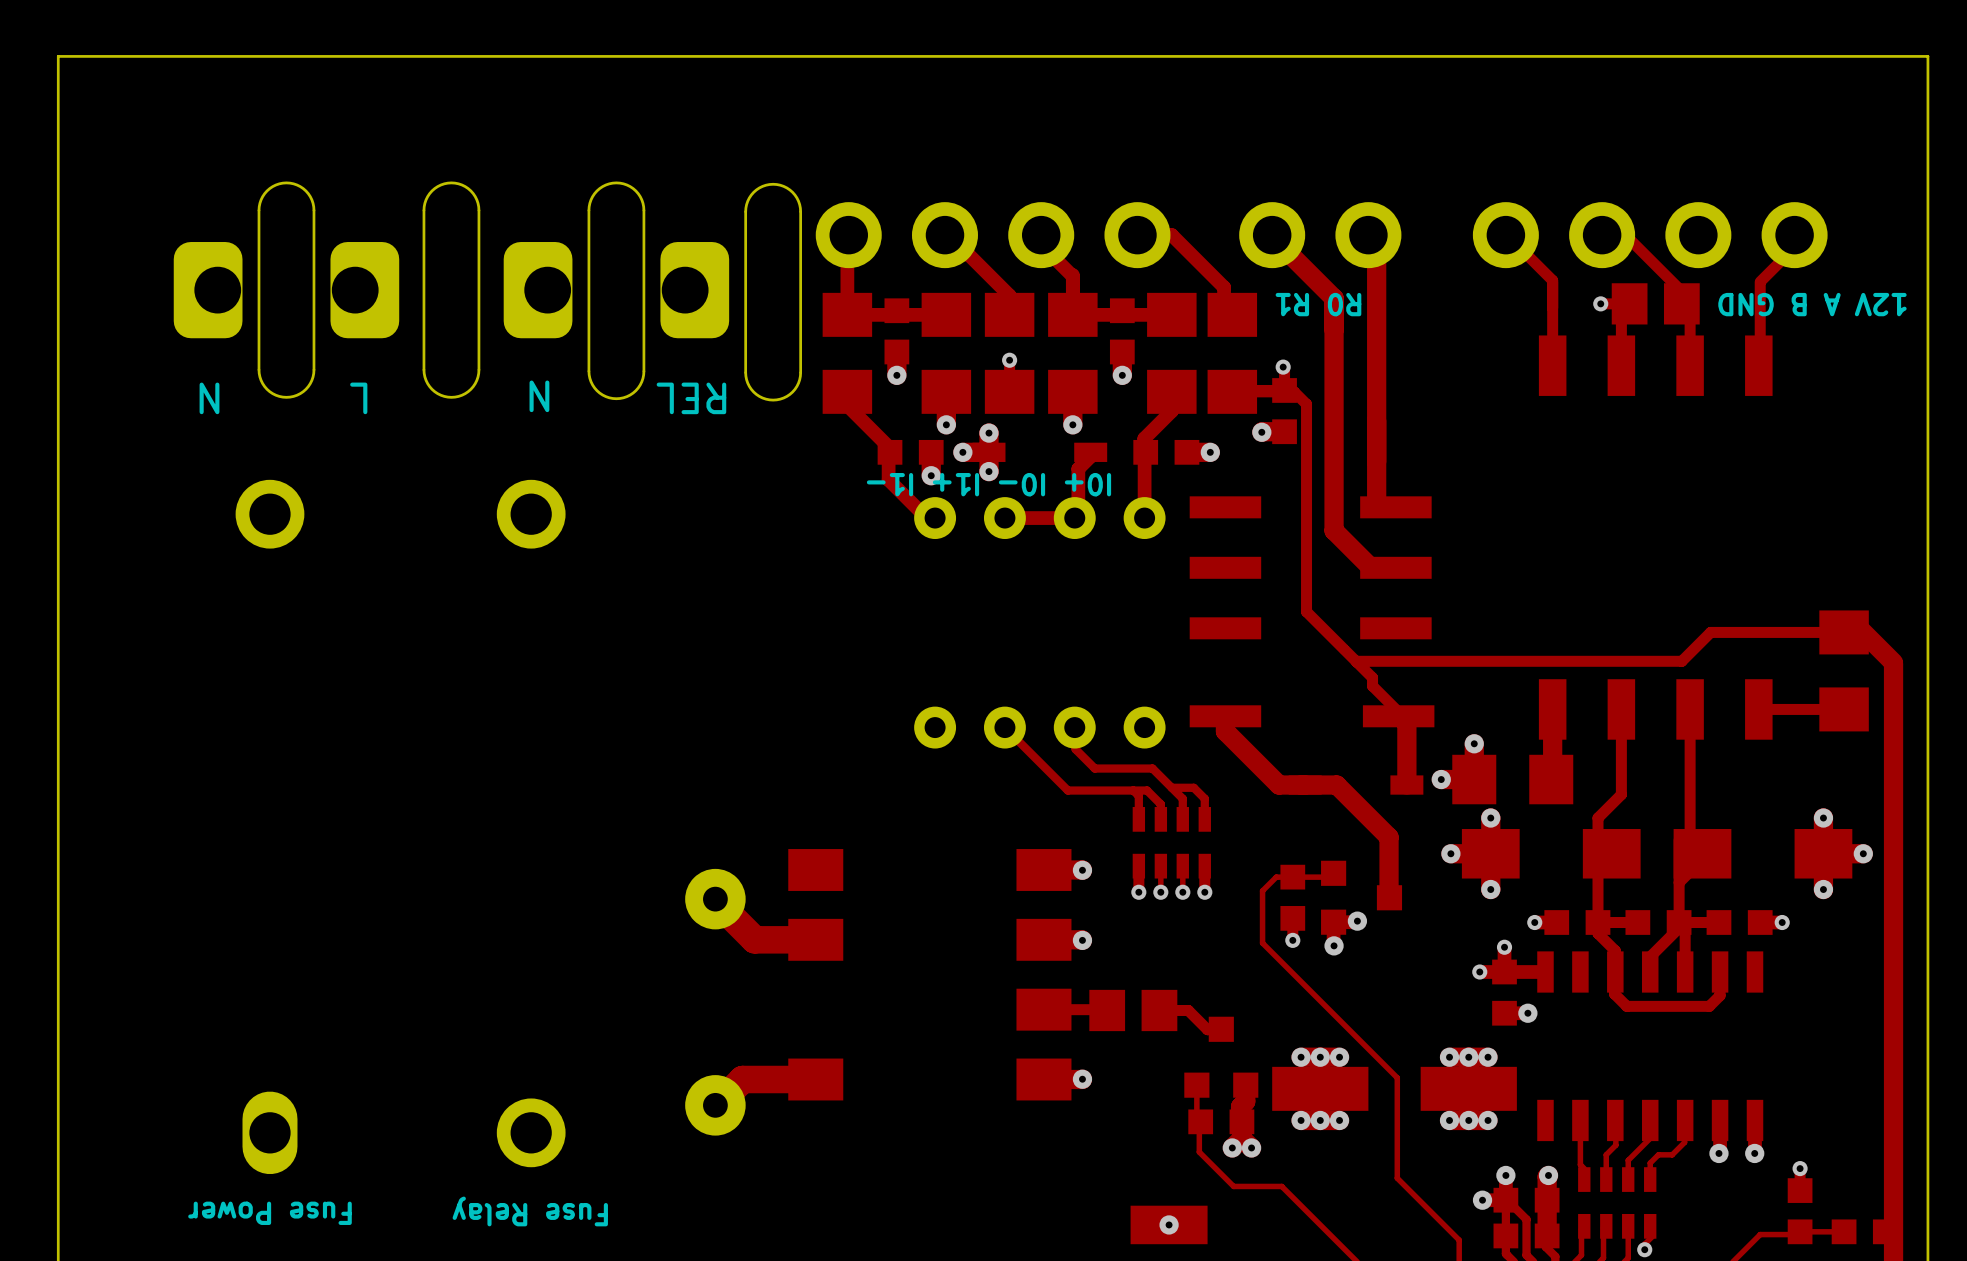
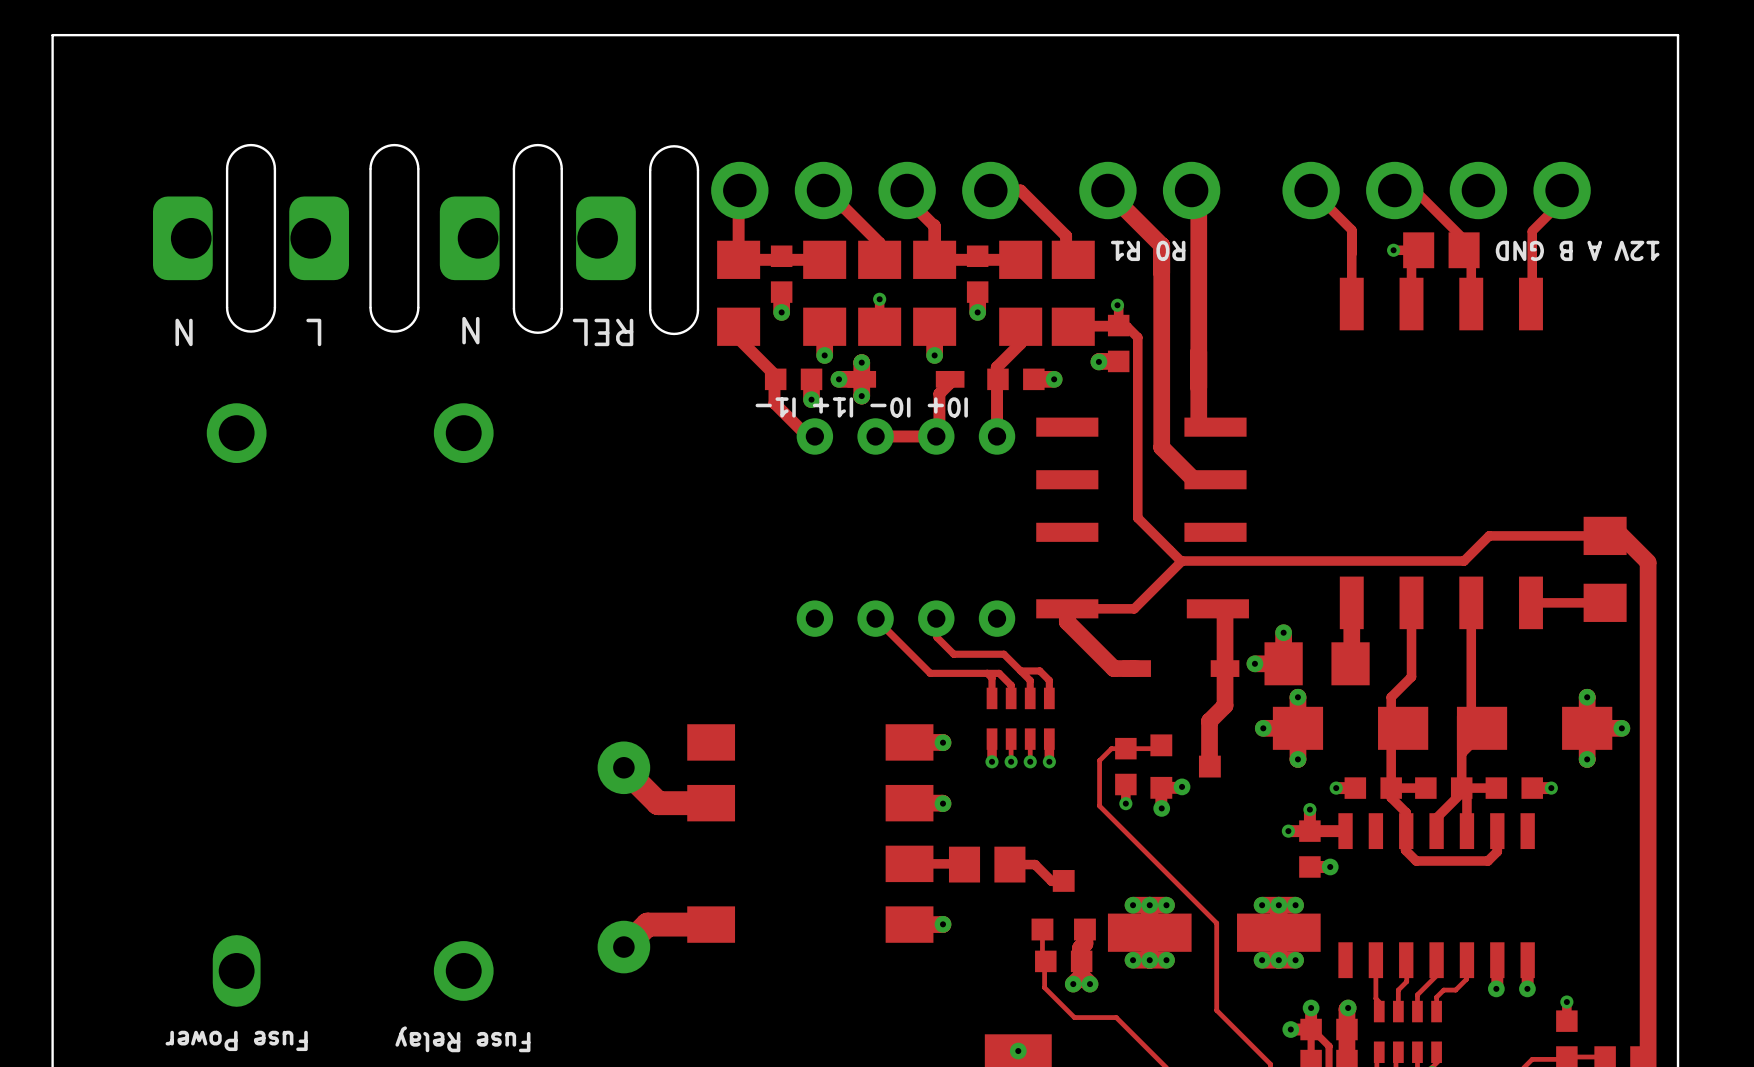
track: (1357, 661) (1372, 677) (1372, 686) (1402, 716) -> (1182, 561) (1134, 608) (1067, 608)
track: (1305, 785) (1336, 785) (1389, 837) (1389, 845) -> (1225, 668) (1225, 705) (1209, 721)

